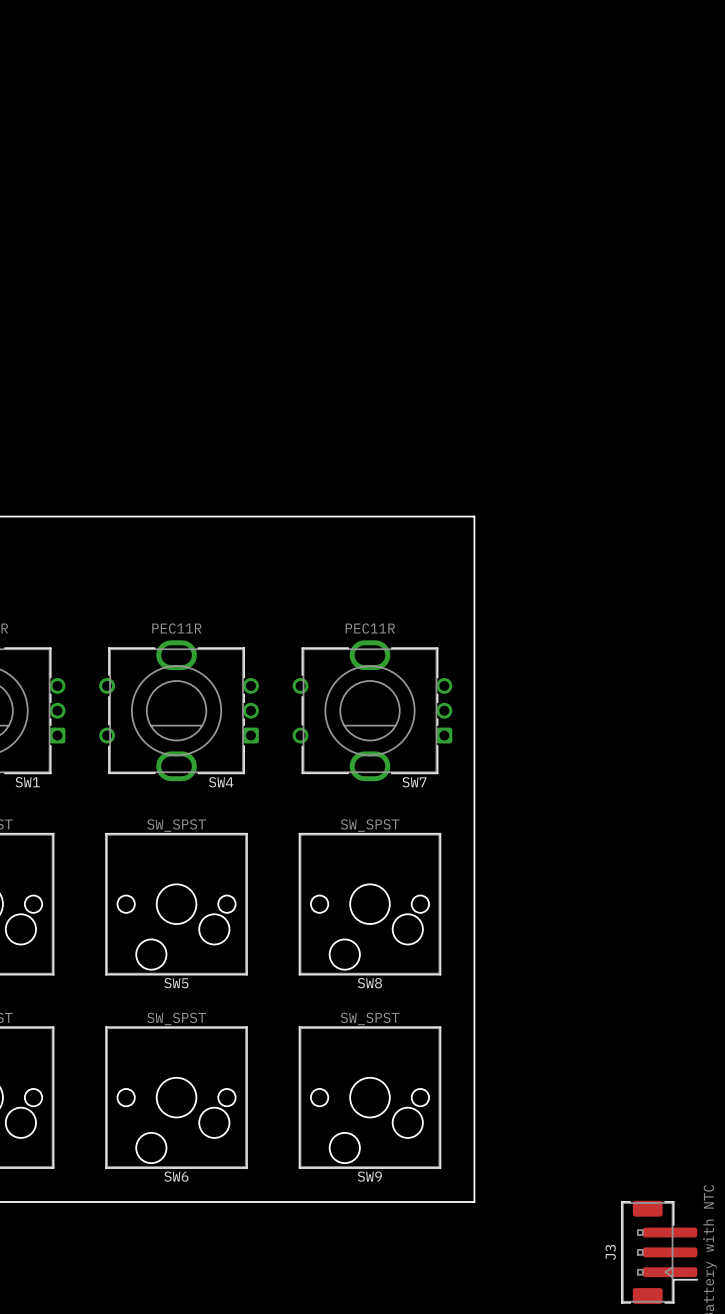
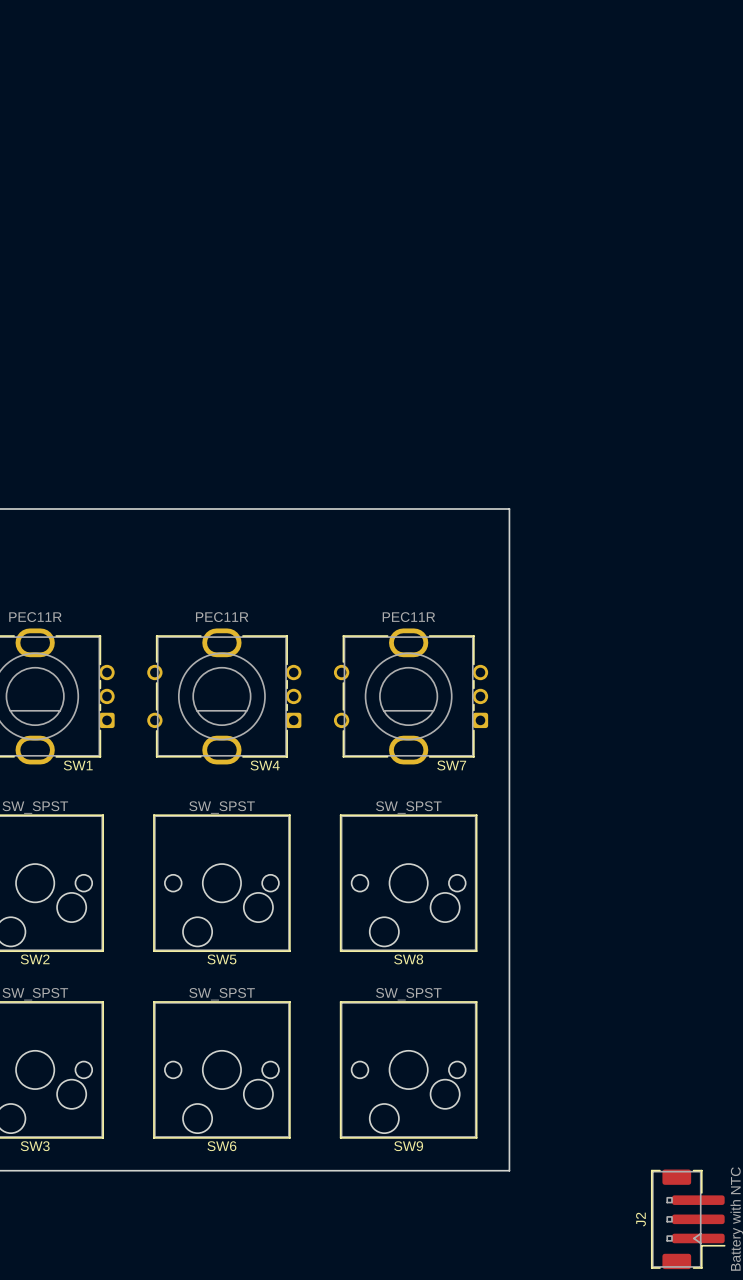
J3 name: J3 (610, 1252) -> J2 (640, 1219)

